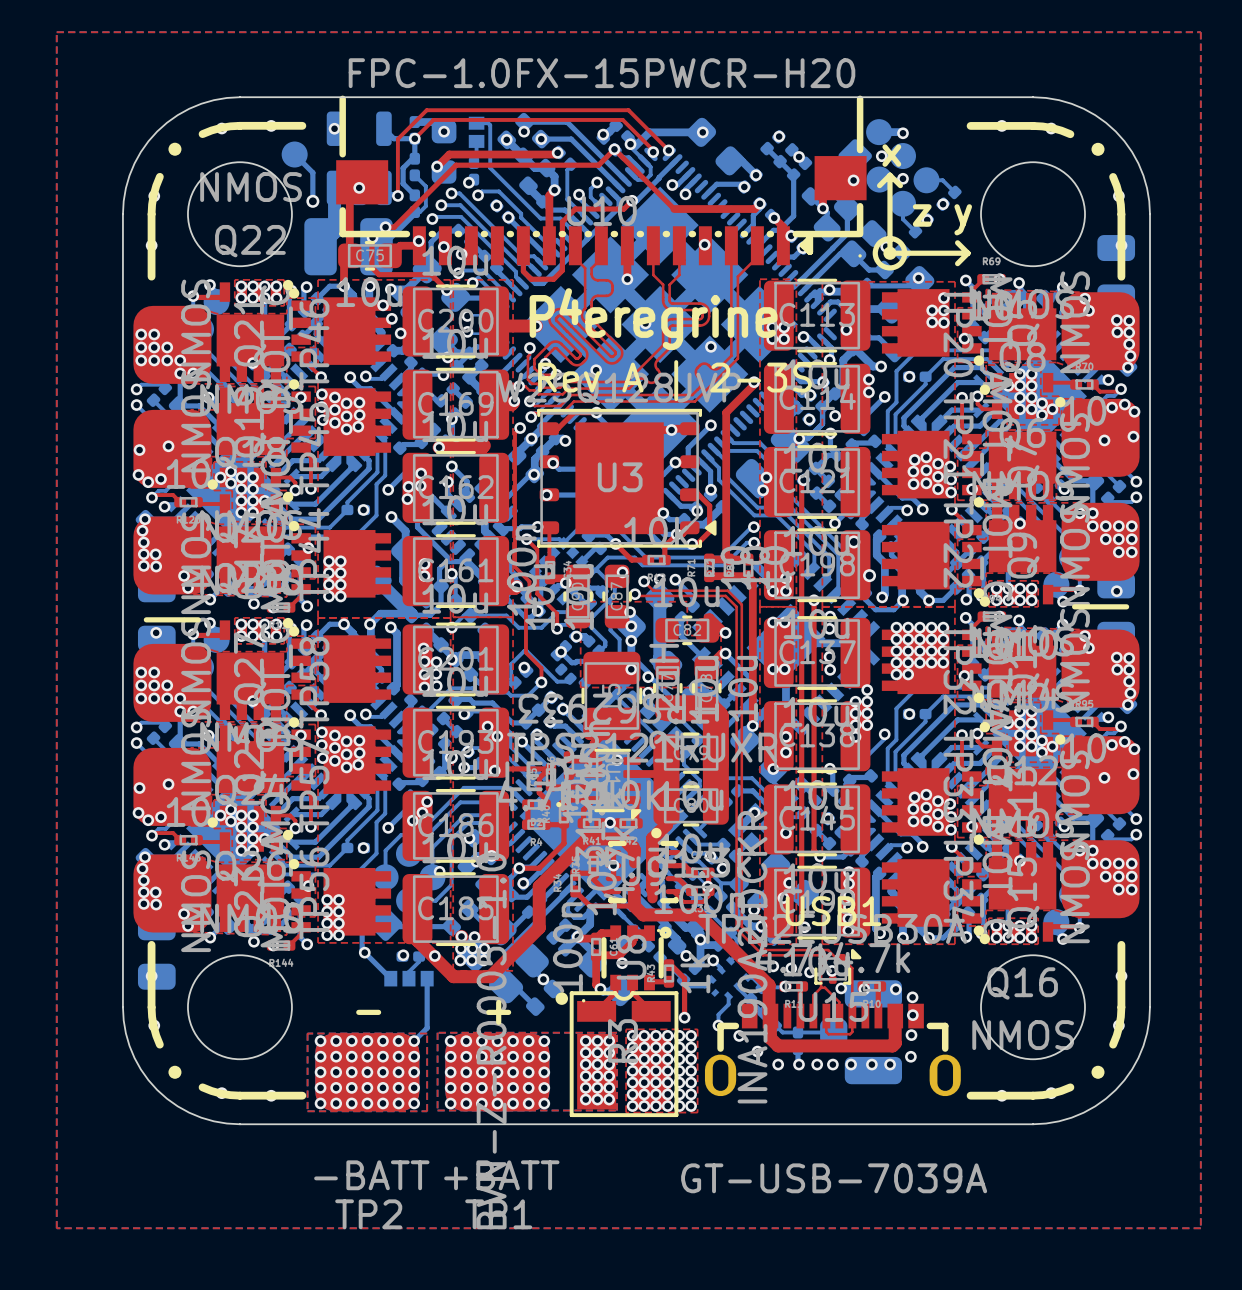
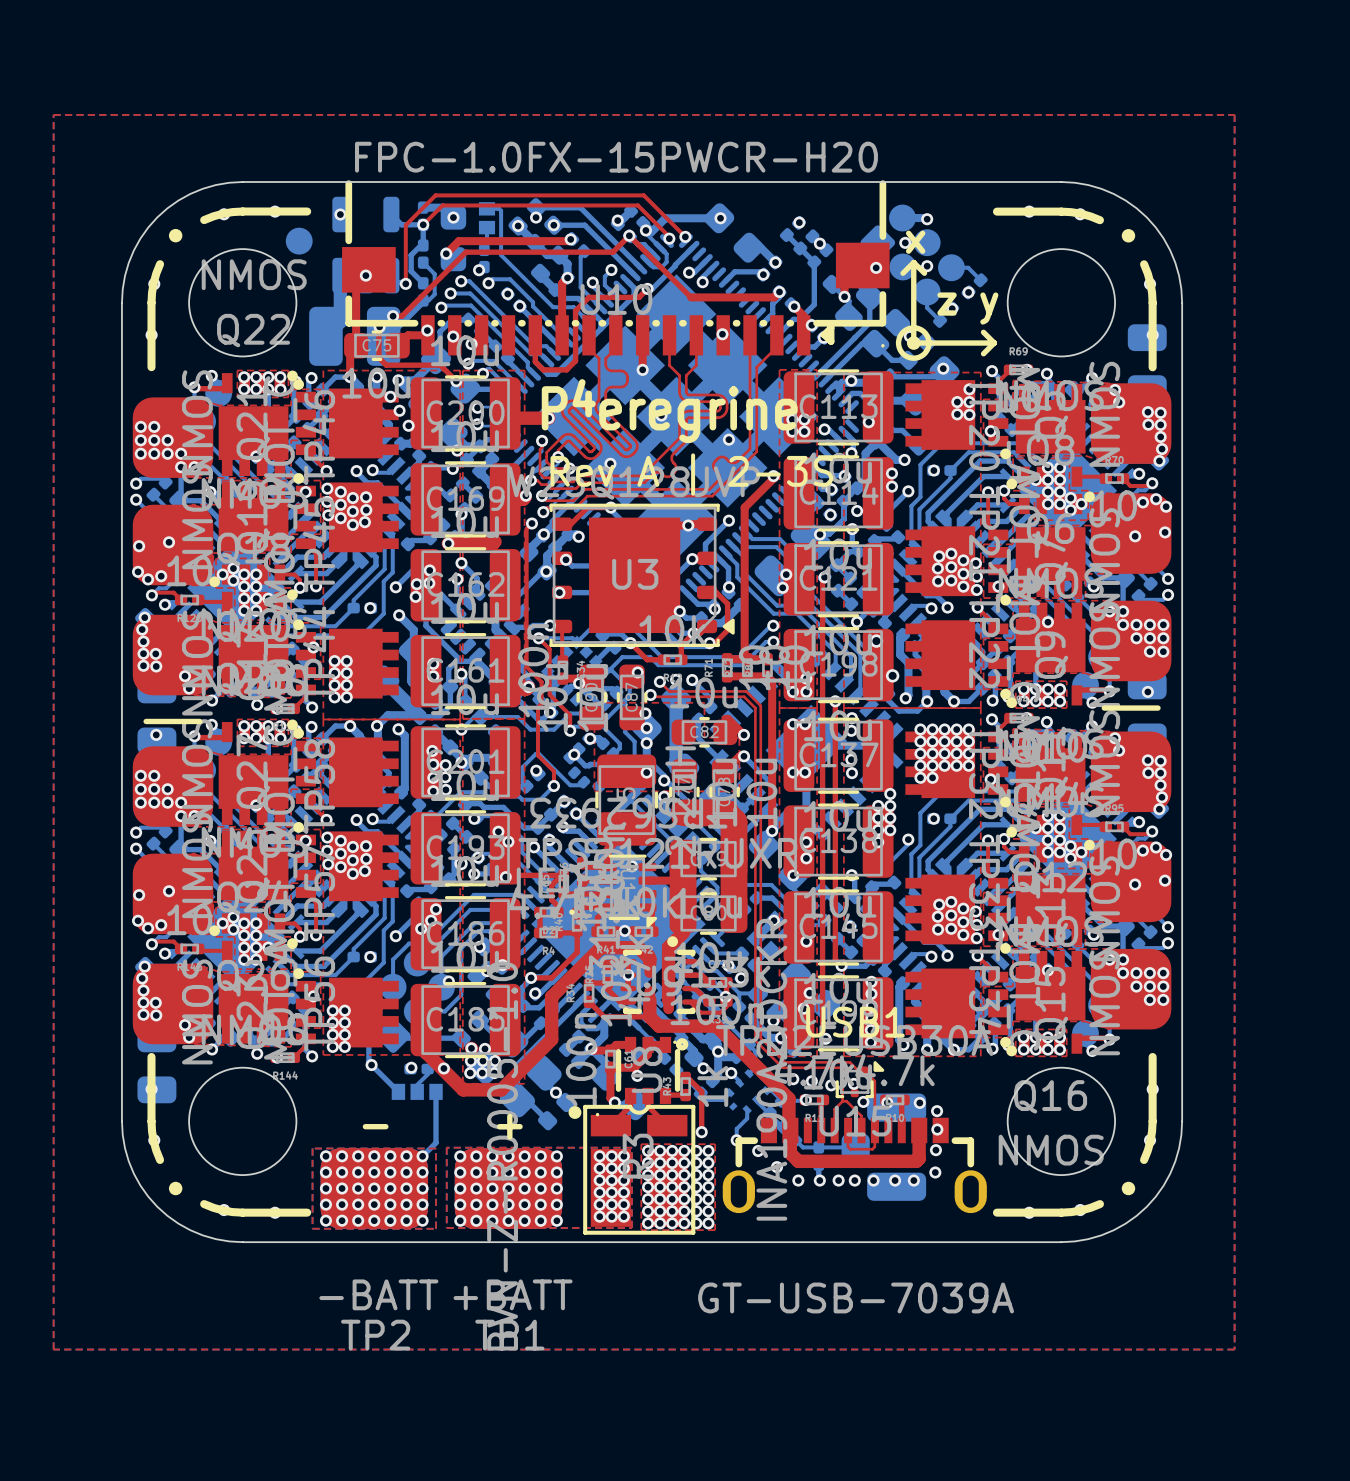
bottom track: (294, 154) (312, 172) (312, 201) -> none
via: (312, 201) -> none

